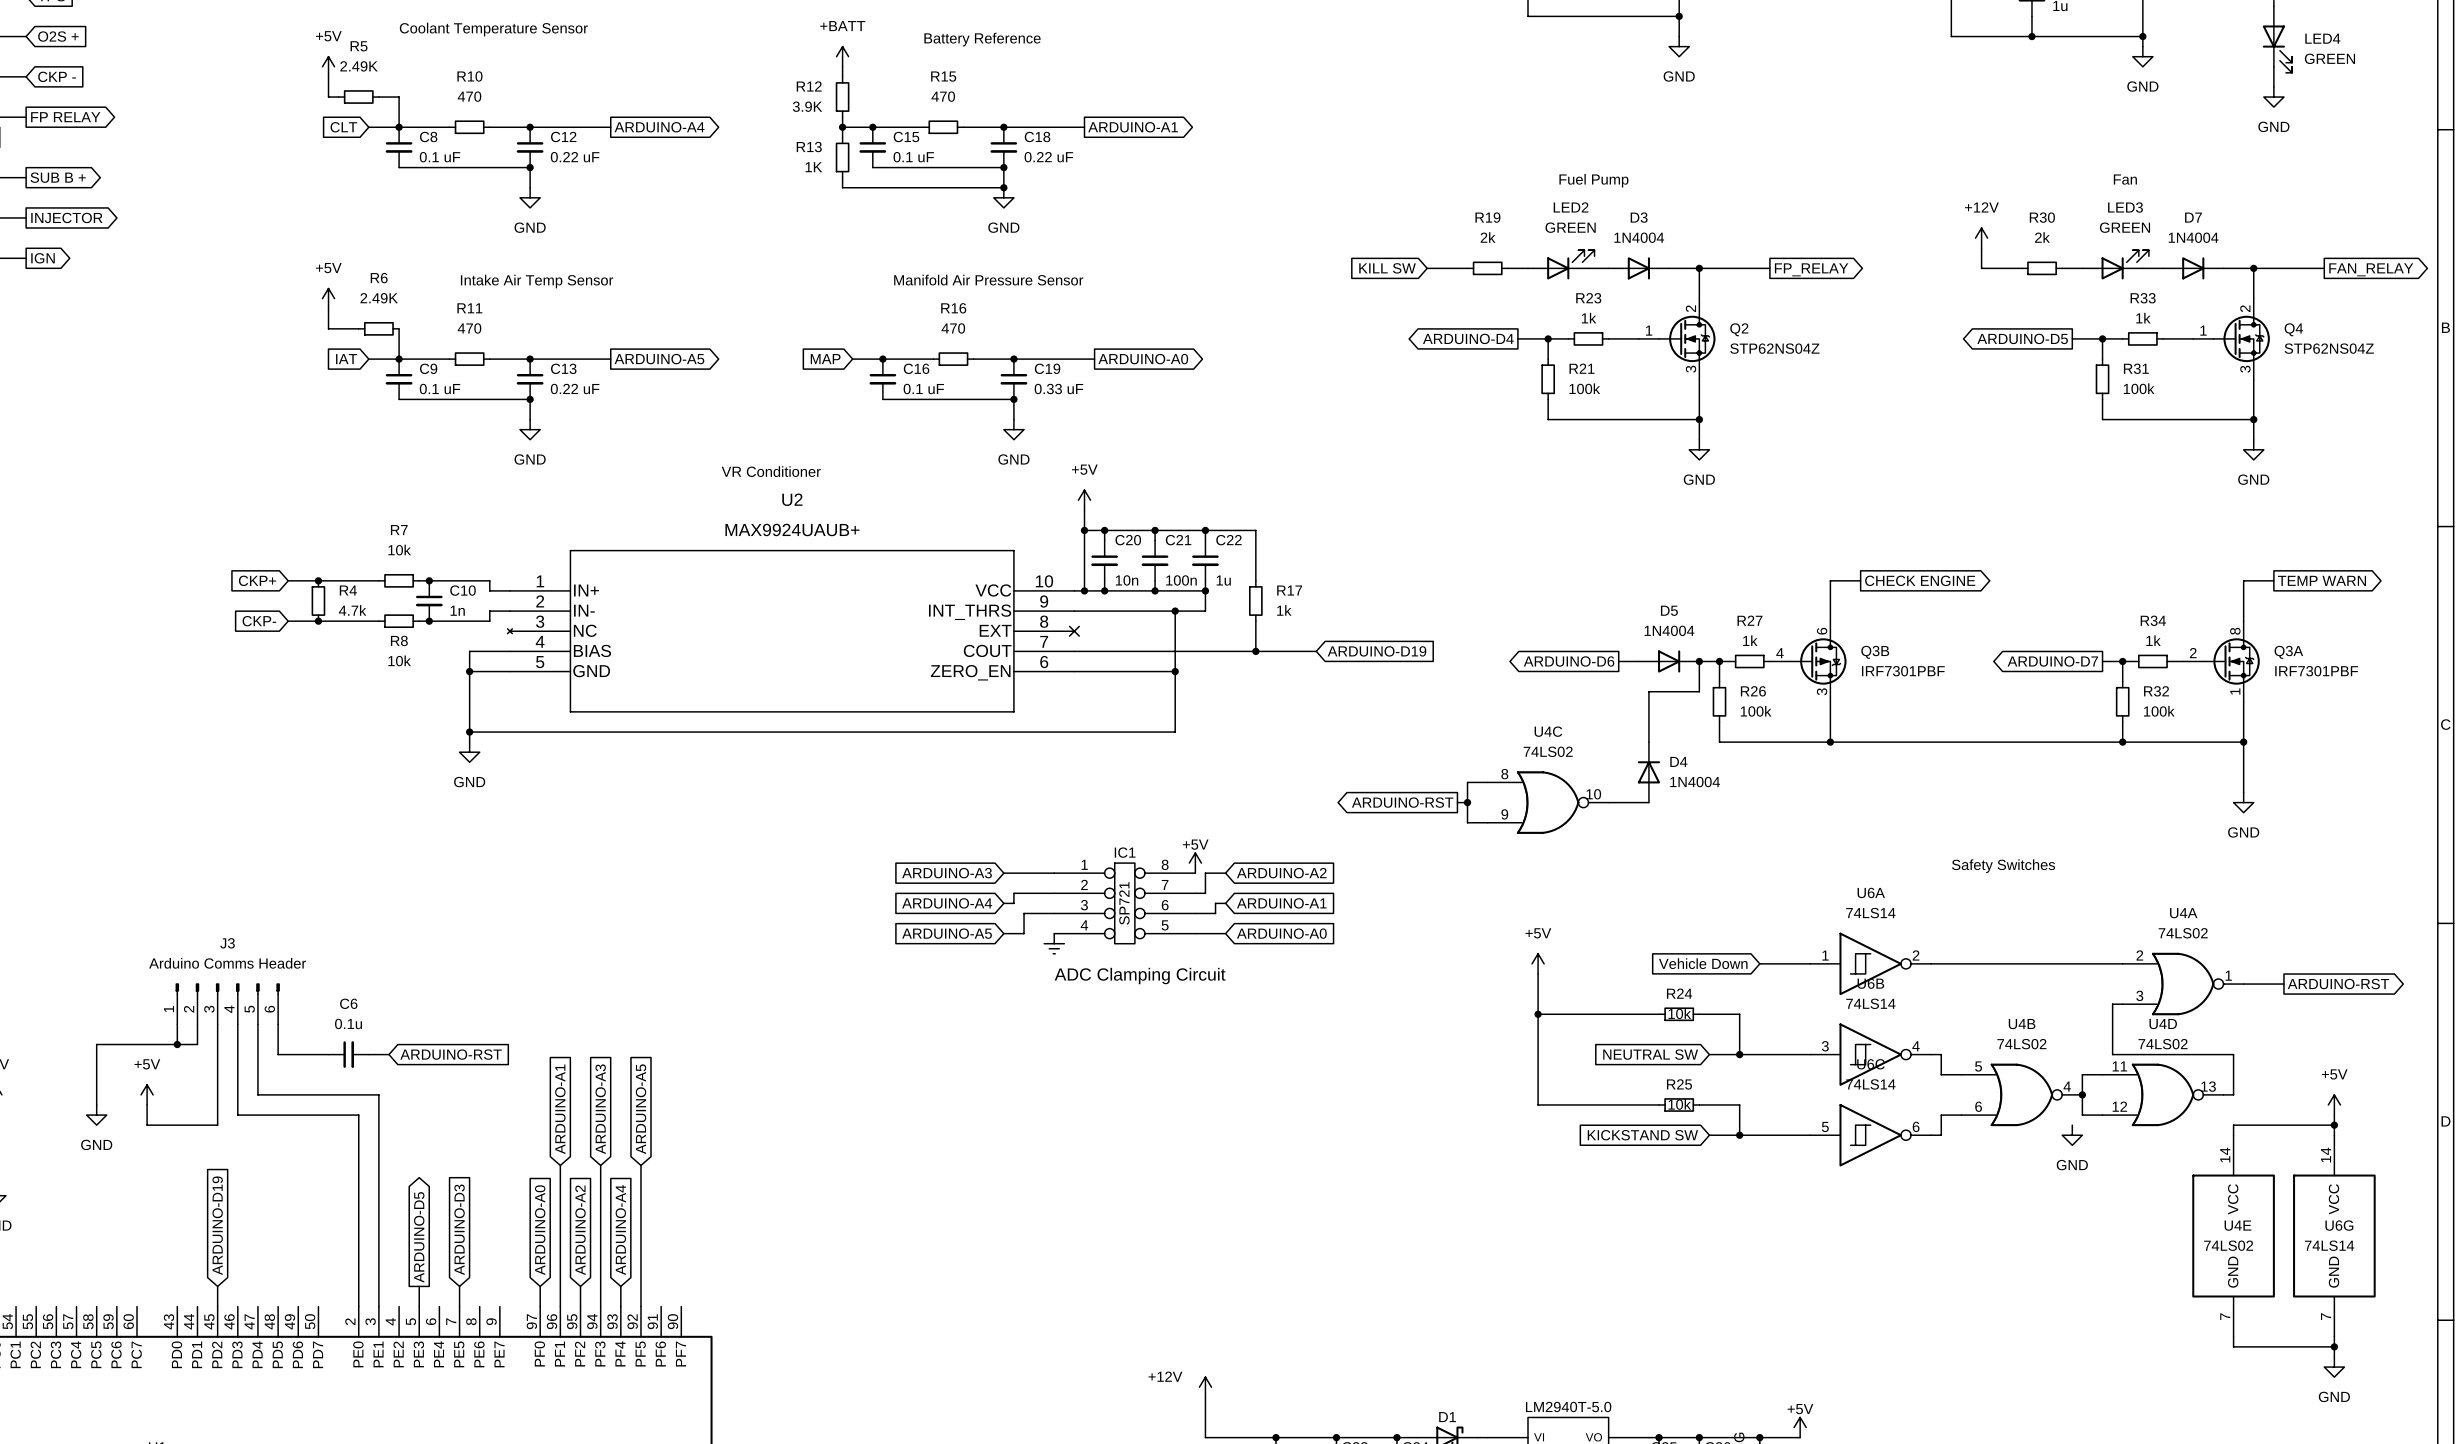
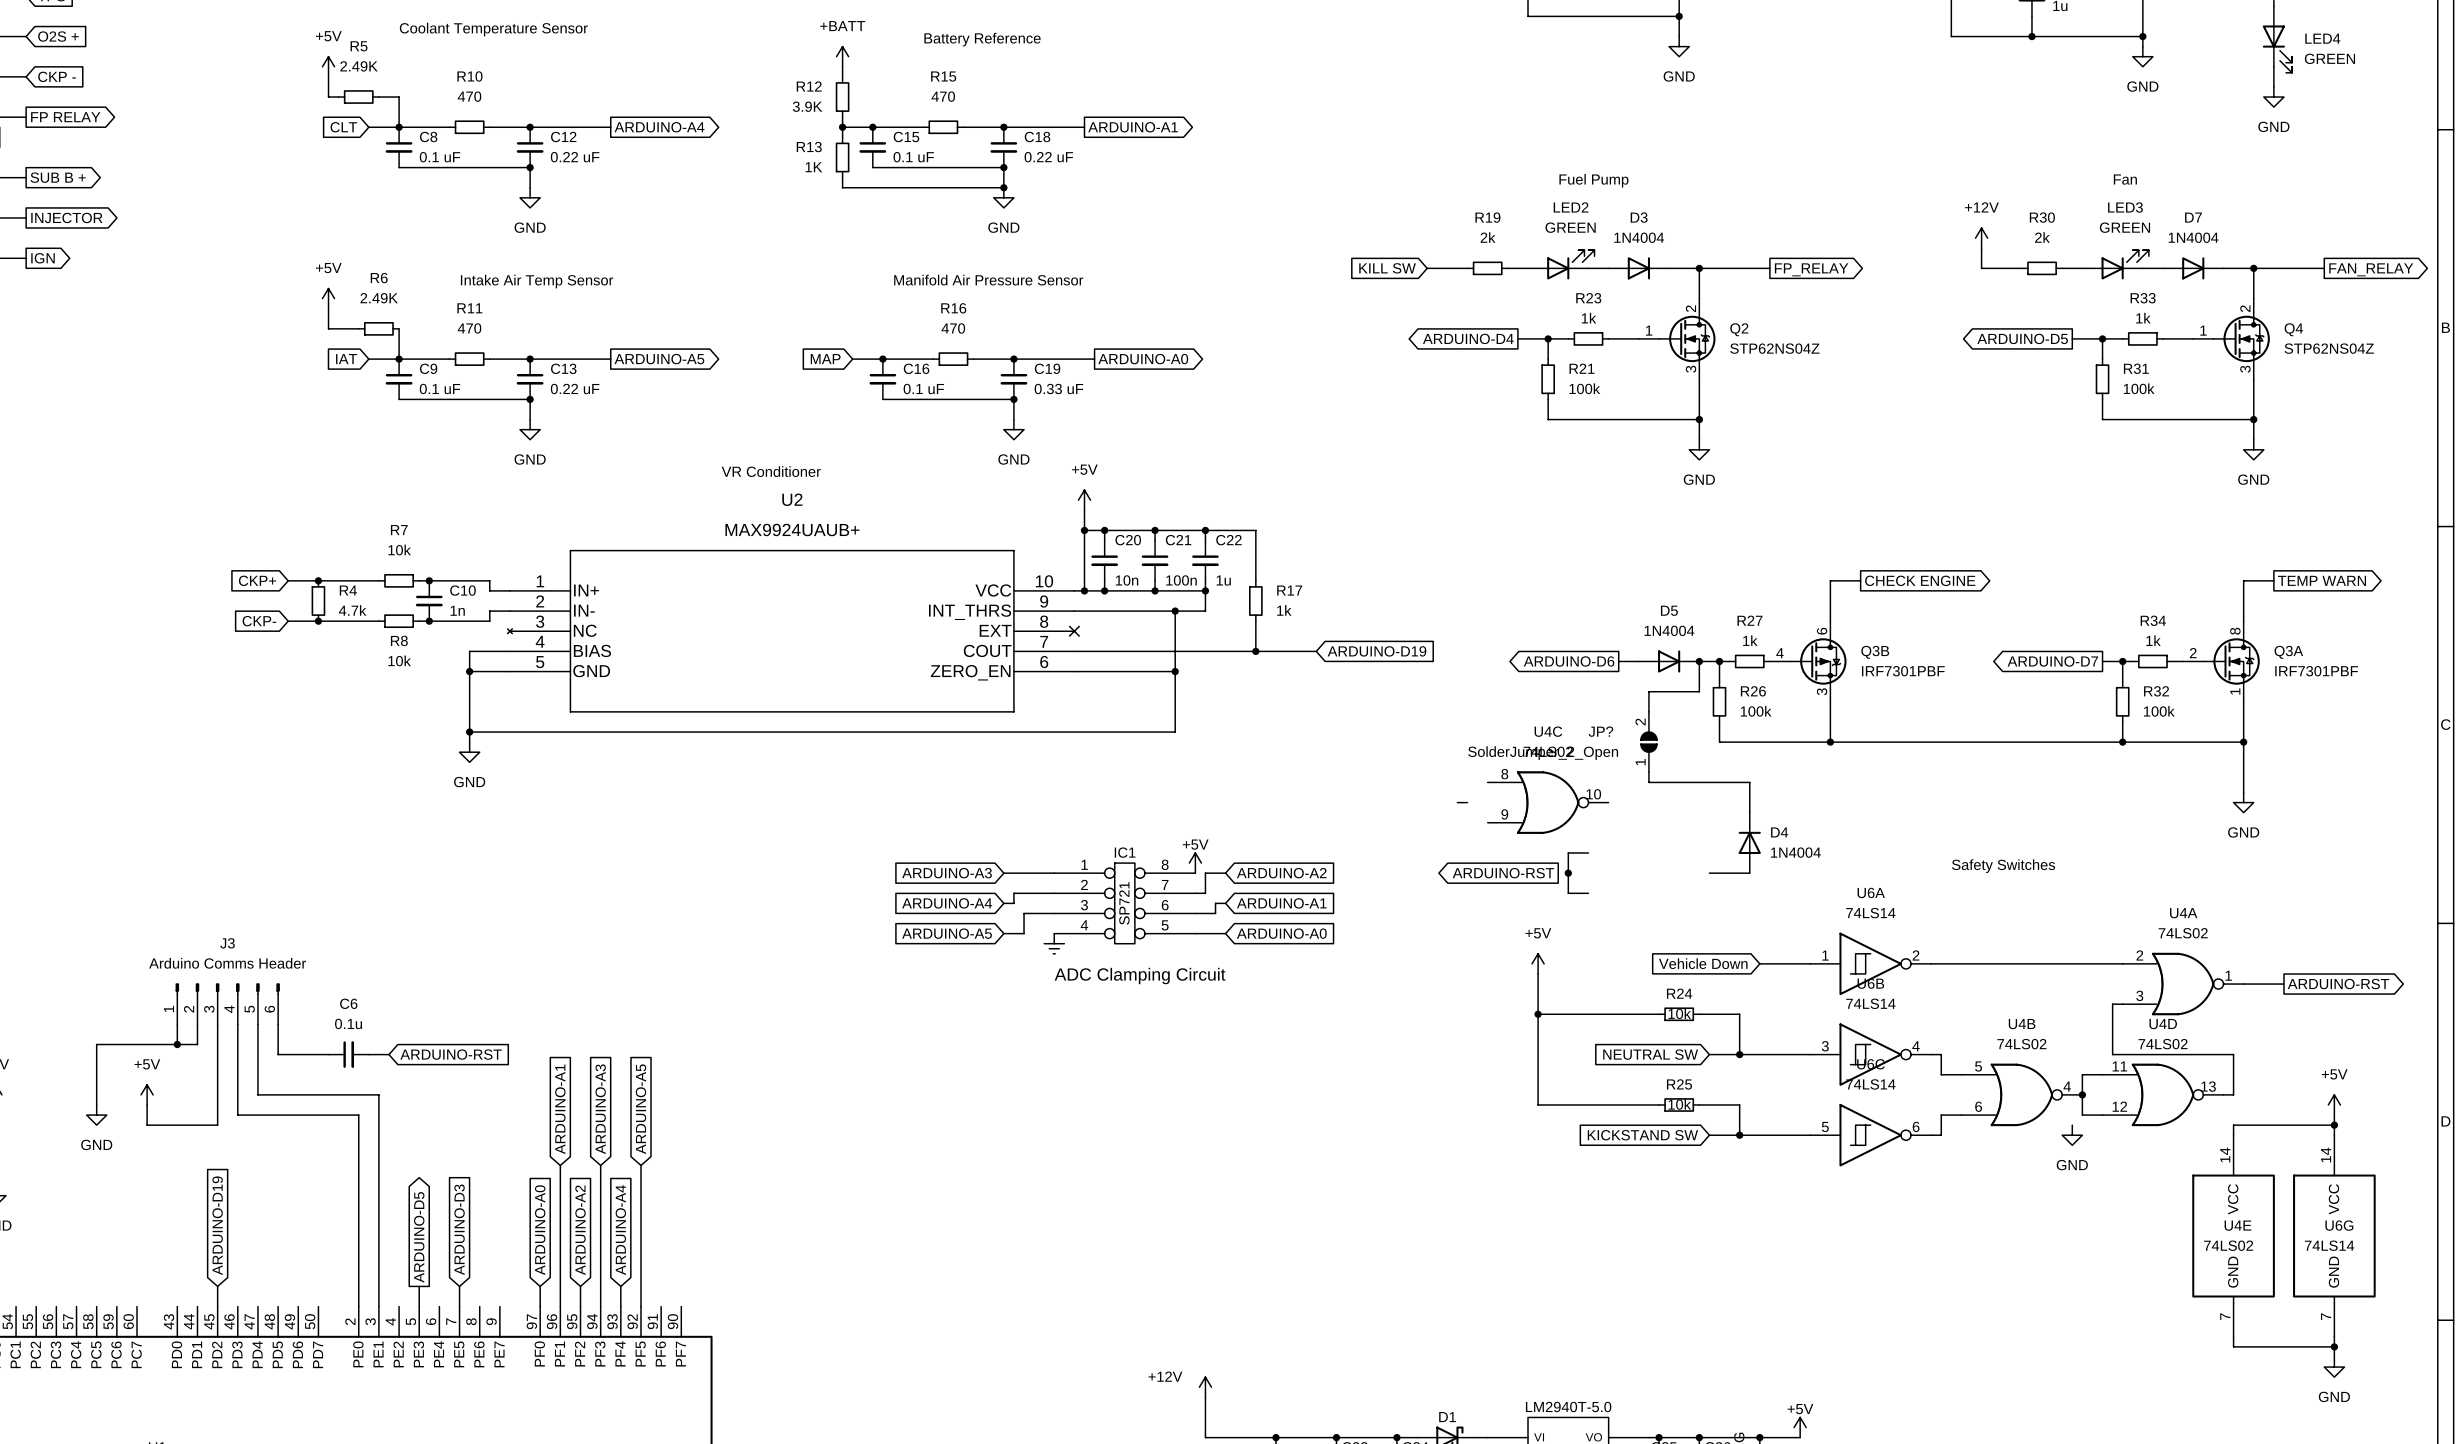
JP?: none -> SolderJumper_2_Open (1648, 742)
wire: none -> (1648, 772) (1648, 782) (1749, 782) (1749, 812)
D4 position: (1648, 772) -> (1749, 842)
wire: (1487, 782) (1467, 782) (1467, 822) (1487, 822) -> (1588, 852) (1568, 852) (1568, 893) (1588, 893)
global label position: ARDUINO-RST (1402, 802) -> ARDUINO-RST (1503, 873)
junction: (1467, 802) -> none
wire: (1608, 802) (1648, 802) -> (1709, 873) (1749, 873)
junction: none -> (1568, 873)

